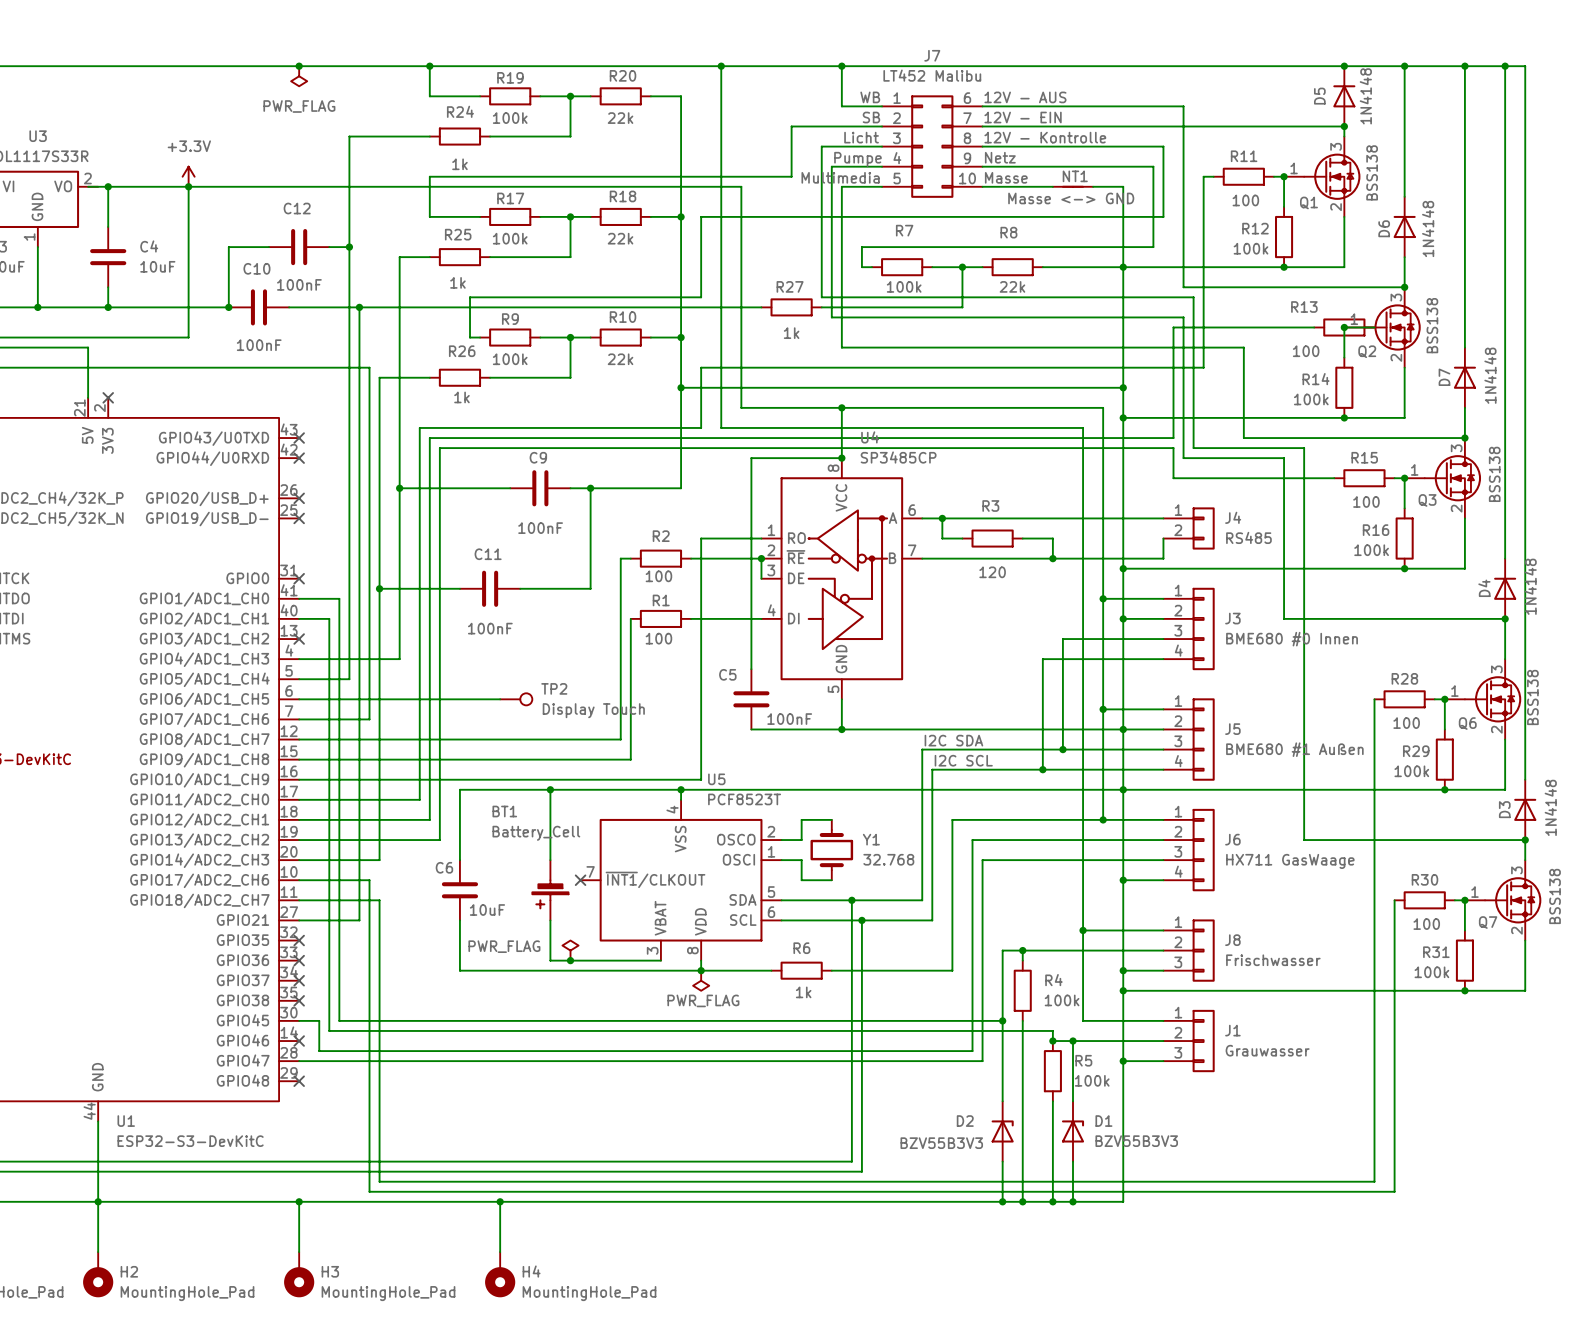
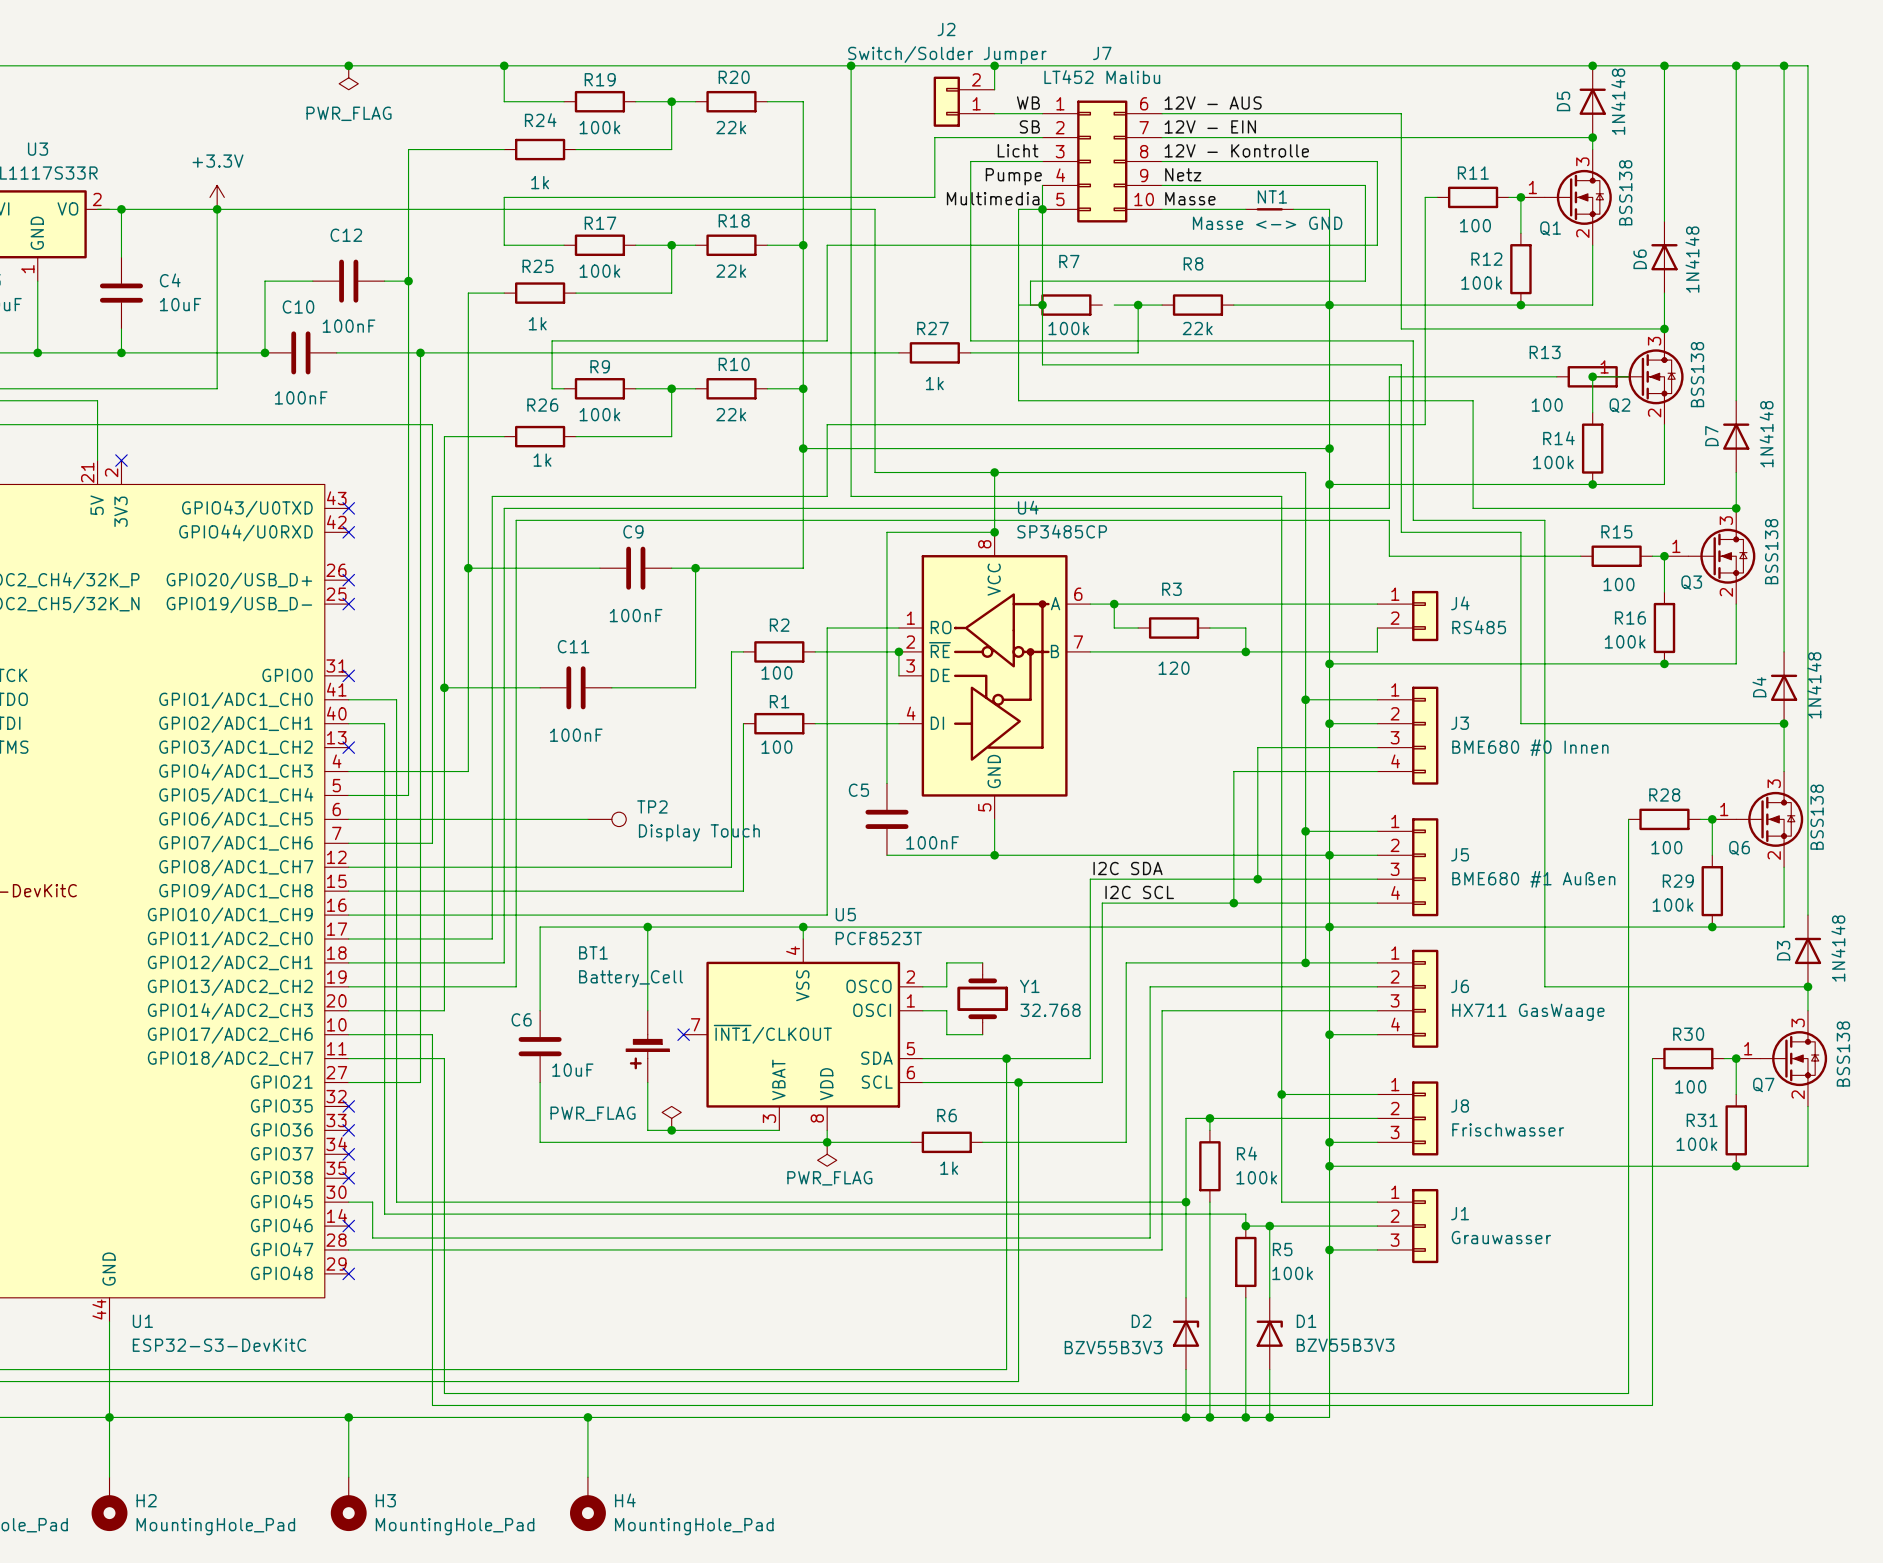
wire: (841, 86) (841, 106) -> none
J2: none -> Switch/Solder Jumper (964, 101)
wire: (882, 166) (831, 166) (831, 317) (882, 317) -> (1042, 185) (1042, 364)
wire: (861, 186) (841, 186) (841, 347) (861, 347) -> (1018, 305) (1018, 400)
wire: none -> (1018, 209) (1018, 281)
junction: none -> (1042, 209)
wire: (861, 247) (872, 247) -> (1042, 305) (1030, 305) (1030, 281)
junction: none -> (1042, 305)
wire: (932, 267) (942, 267) -> none

